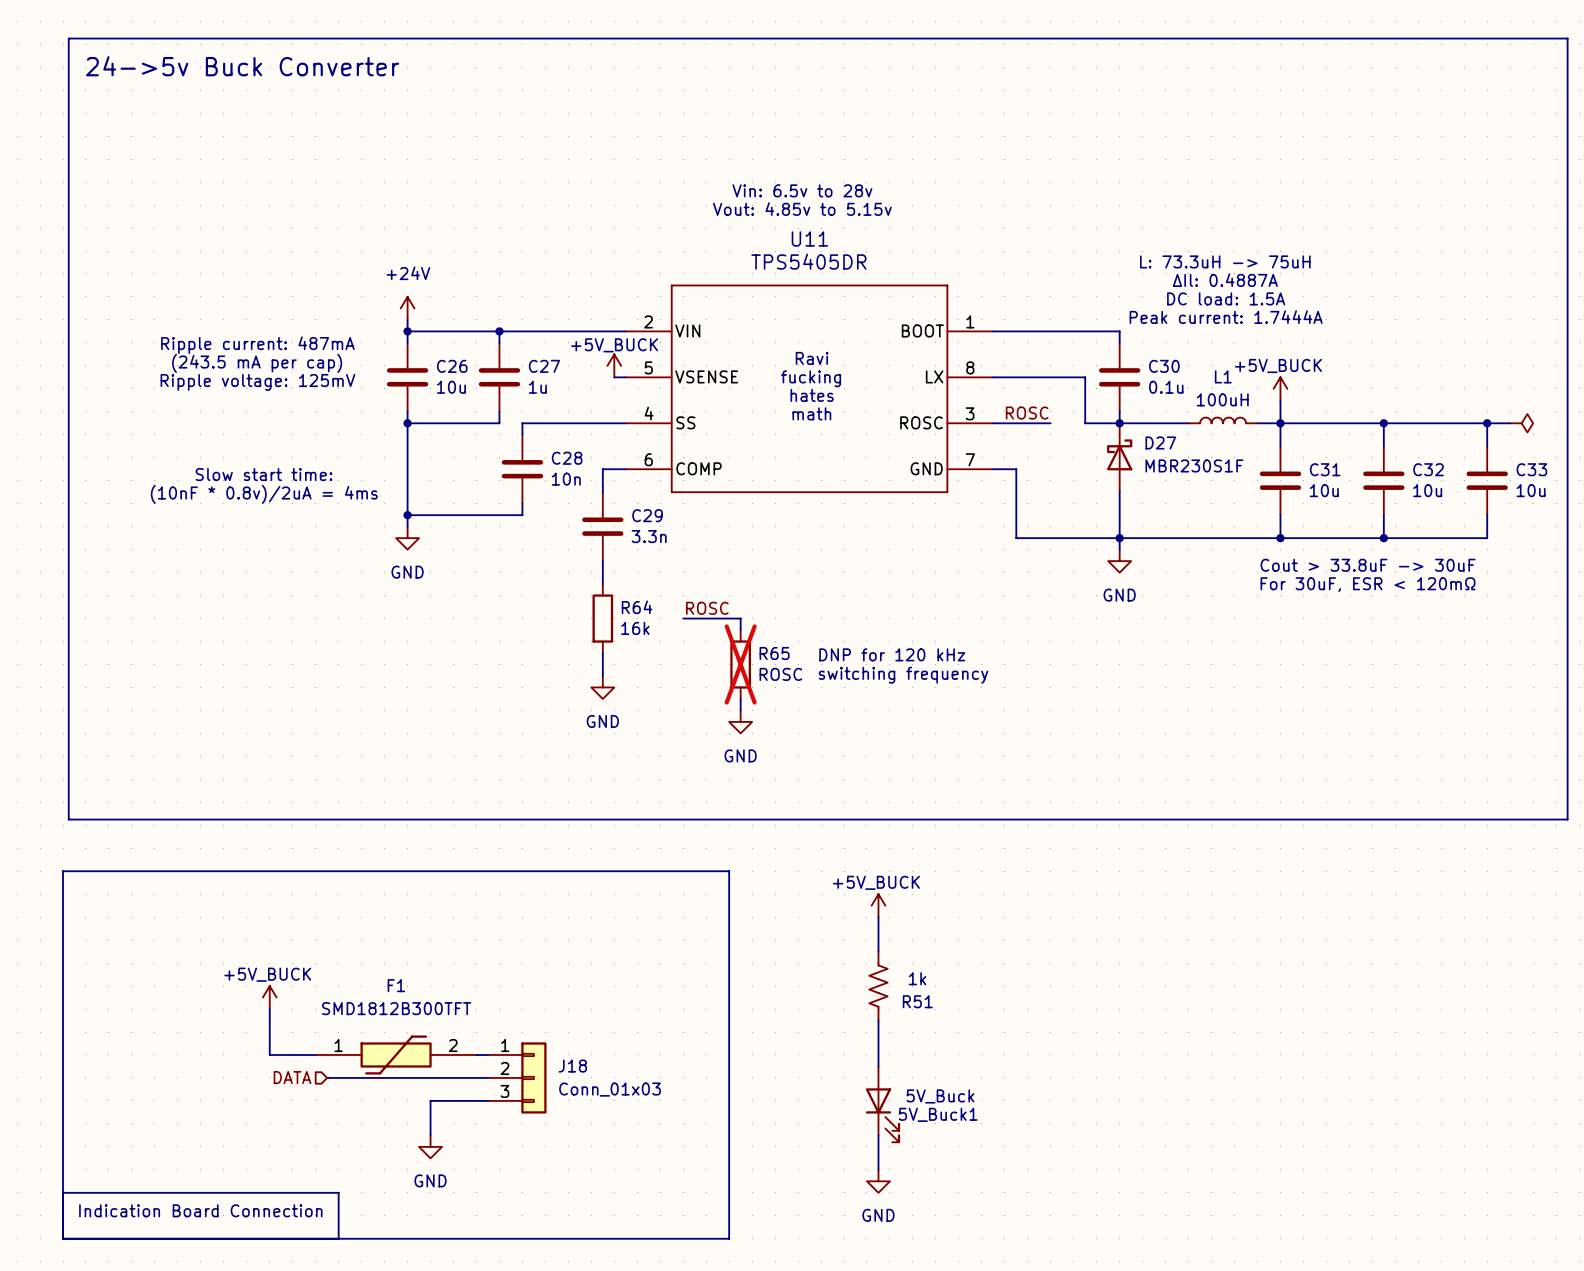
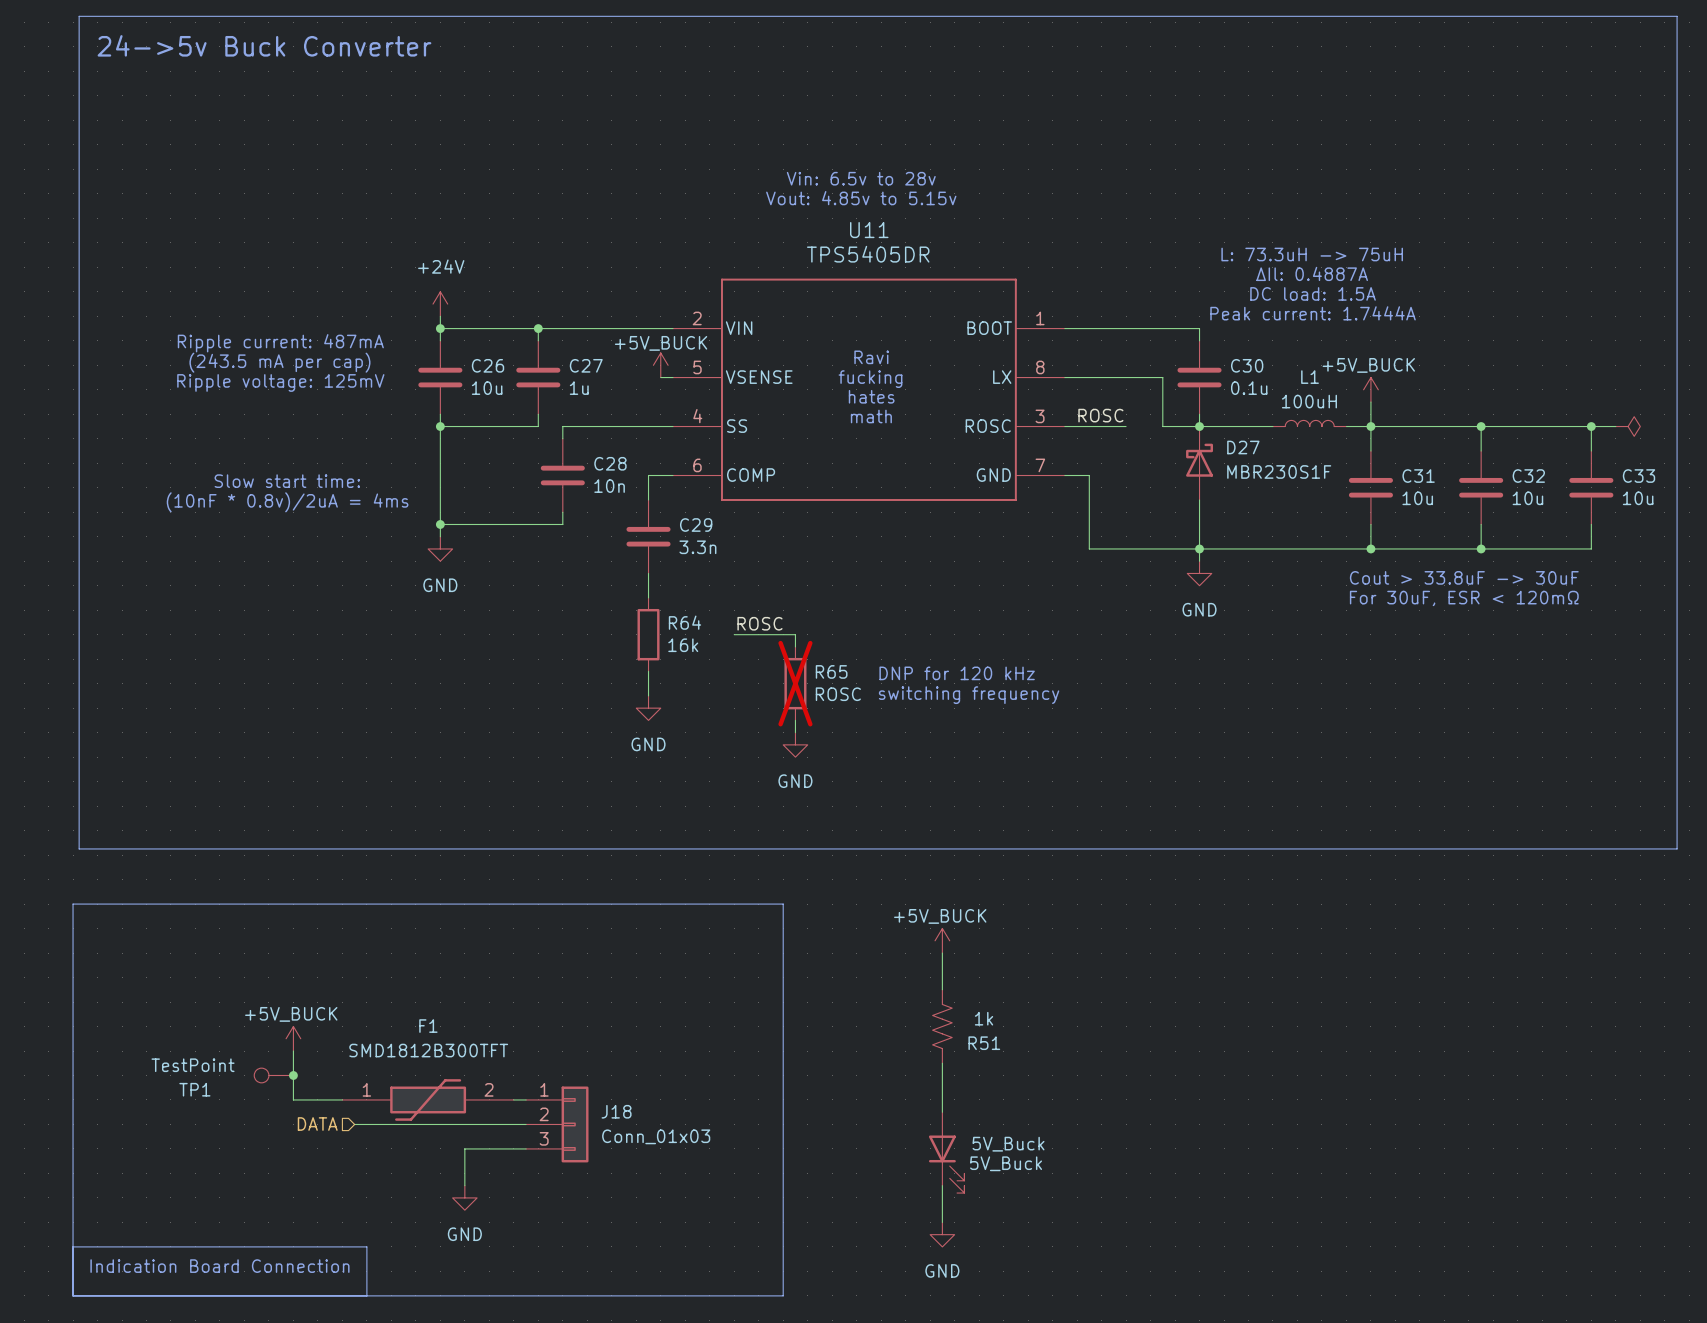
TP1: none -> TestPoint (273, 1075)
junction: none -> (293, 1075)
5V_Buck1 name: 5V_Buck1 (938, 1114) -> 5V_Buck (1006, 1163)

